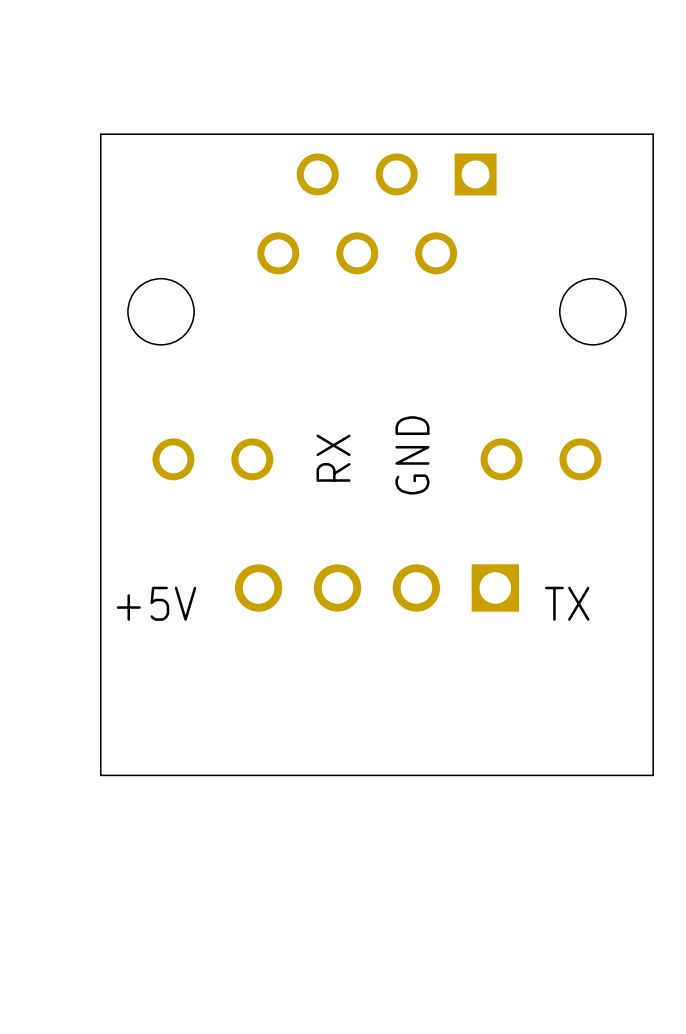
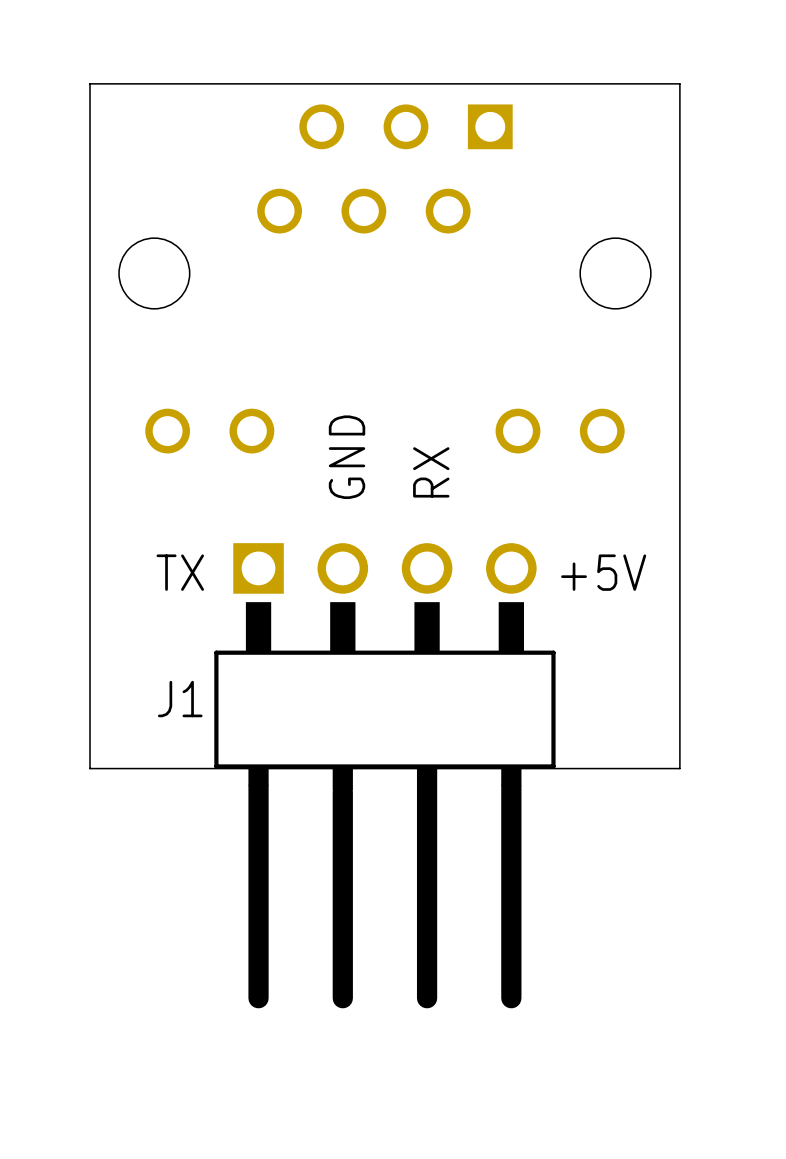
text position: GND (412, 455) -> GND (347, 457)
text position: RX (333, 458) -> RX (431, 472)
J1 side: top (376, 587) -> bottom (384, 775)
text position: +5V (156, 603) -> +5V (603, 572)
text position: TX (567, 603) -> TX (180, 572)

